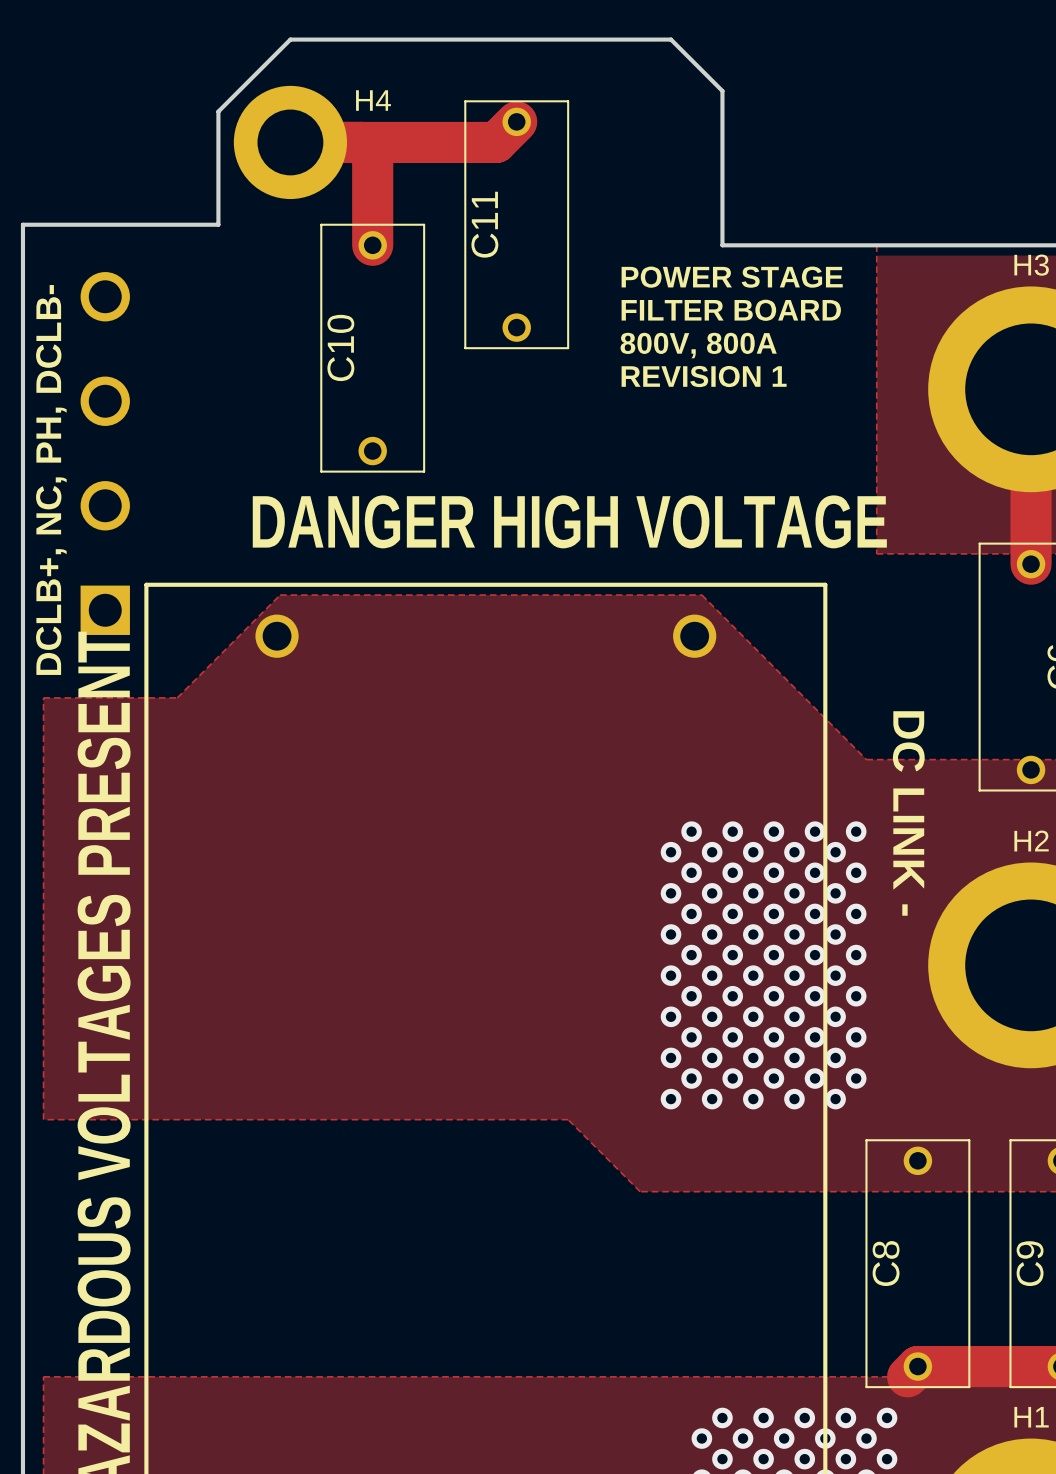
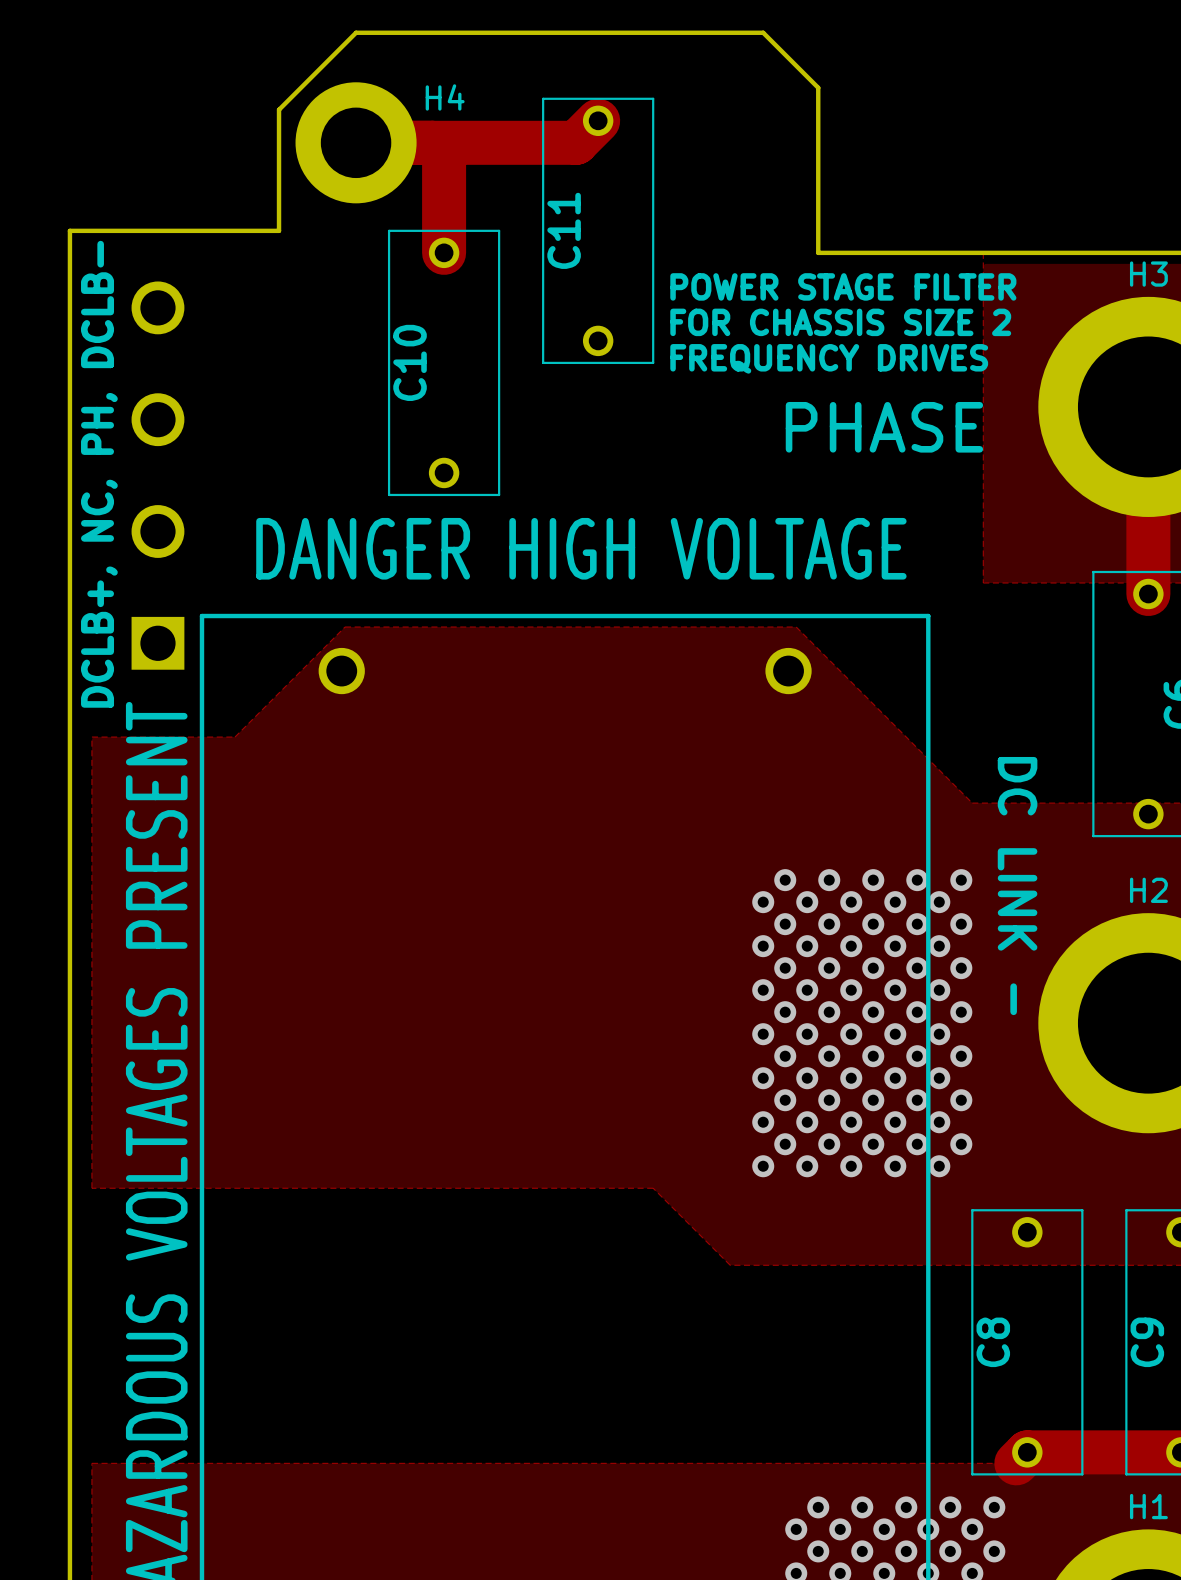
text: POWER STAGE (732, 277) -> POWER STAGE FILTER (843, 286)
text: none -> FOR CHASSIS SIZE 2 (840, 322)
text: FILTER BOARD (731, 310) -> none
text: 800V, 800A (698, 345) -> none
text: none -> FREQUENCY DRIVES (829, 358)
text: REVISION 1 (704, 376) -> none
text: none -> PHASE (884, 427)
text position: DANGER HIGH VOLTAGE (569, 521) -> DANGER HIGH VOLTAGE (581, 548)

